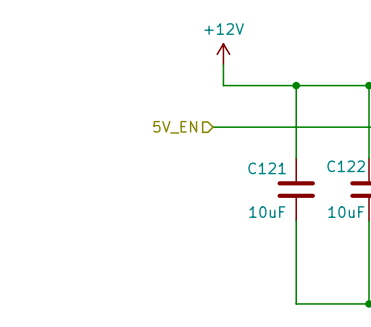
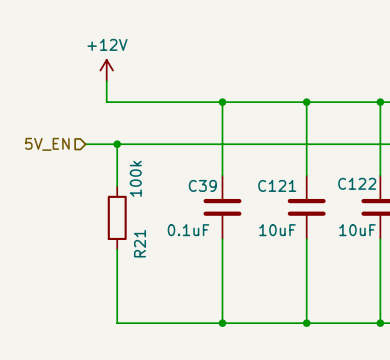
power symbol position: +12V (223, 54) -> +12V (106, 70)
wire: (223, 64) (223, 85) -> (106, 81) (106, 102) (233, 102)
wire: none -> (222, 102) (222, 175)
junction: none -> (222, 102)
wire: none -> (85, 144) (222, 144)
wire: none -> (117, 144) (117, 186)
junction: none -> (117, 144)
hierarchical label position: 5V_EN (175, 127) -> 5V_EN (47, 144)
C39: none -> 0.1uF (222, 207)
R21: none -> 100k (117, 217)
wire: none -> (222, 238) (222, 323)
wire: none -> (117, 249) (117, 323) (306, 323)
junction: none -> (222, 323)
junction: none -> (306, 323)

